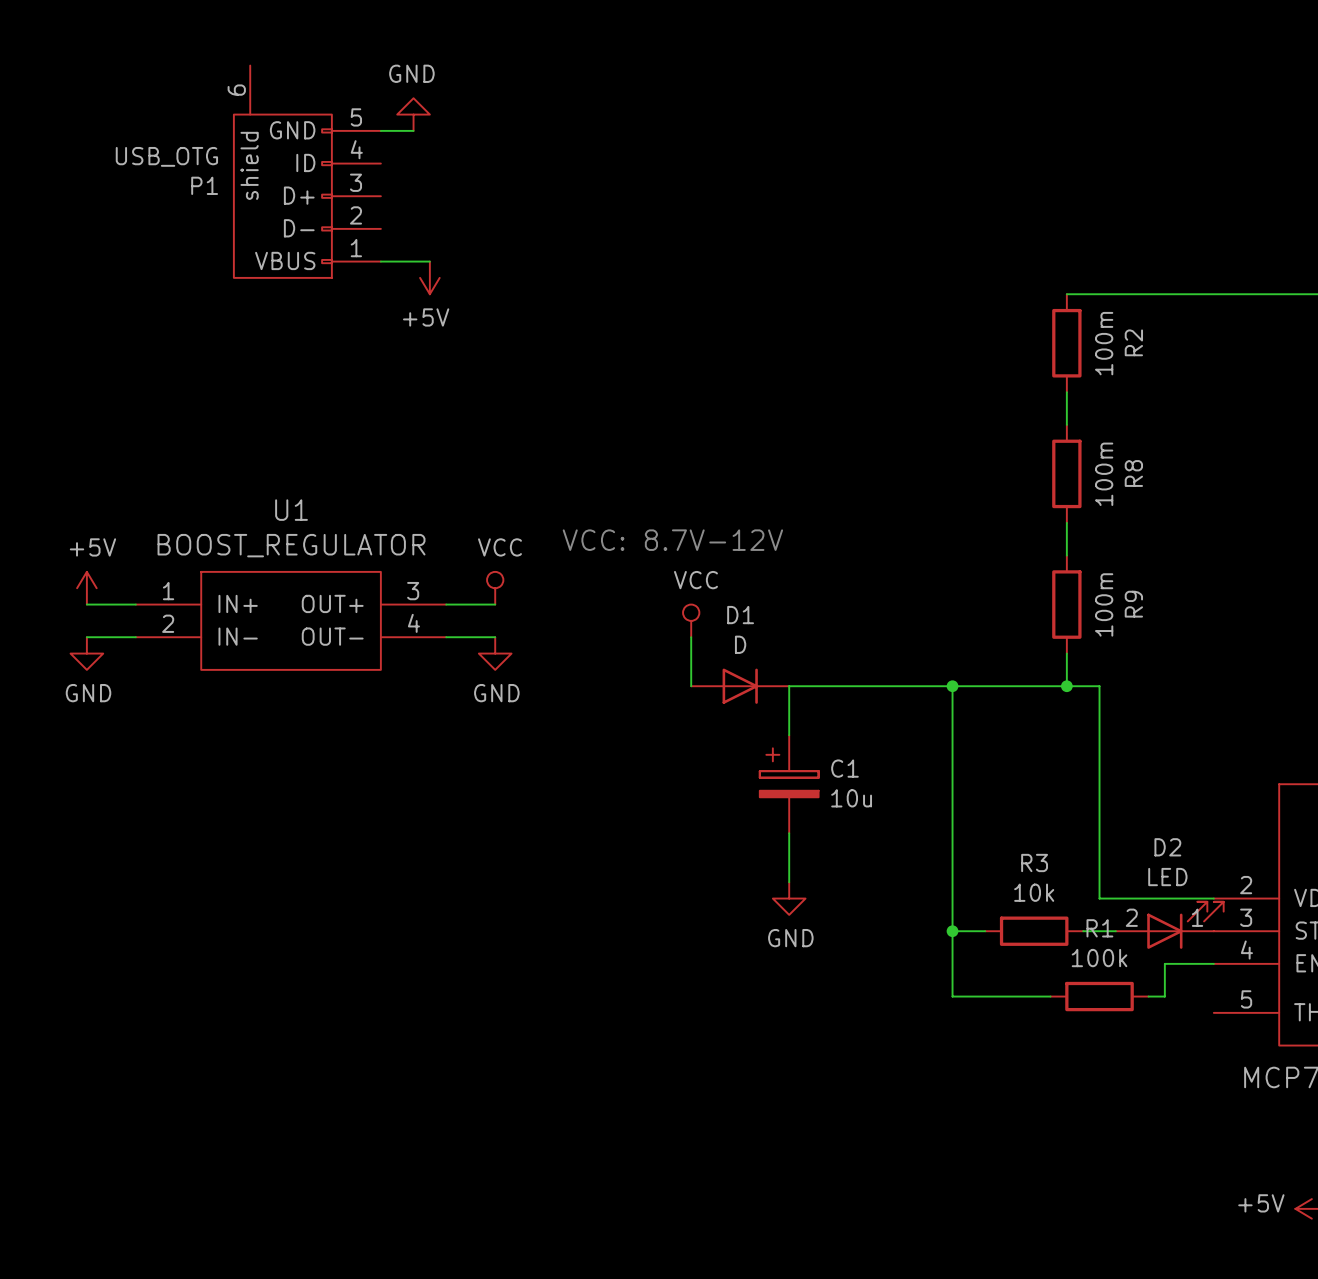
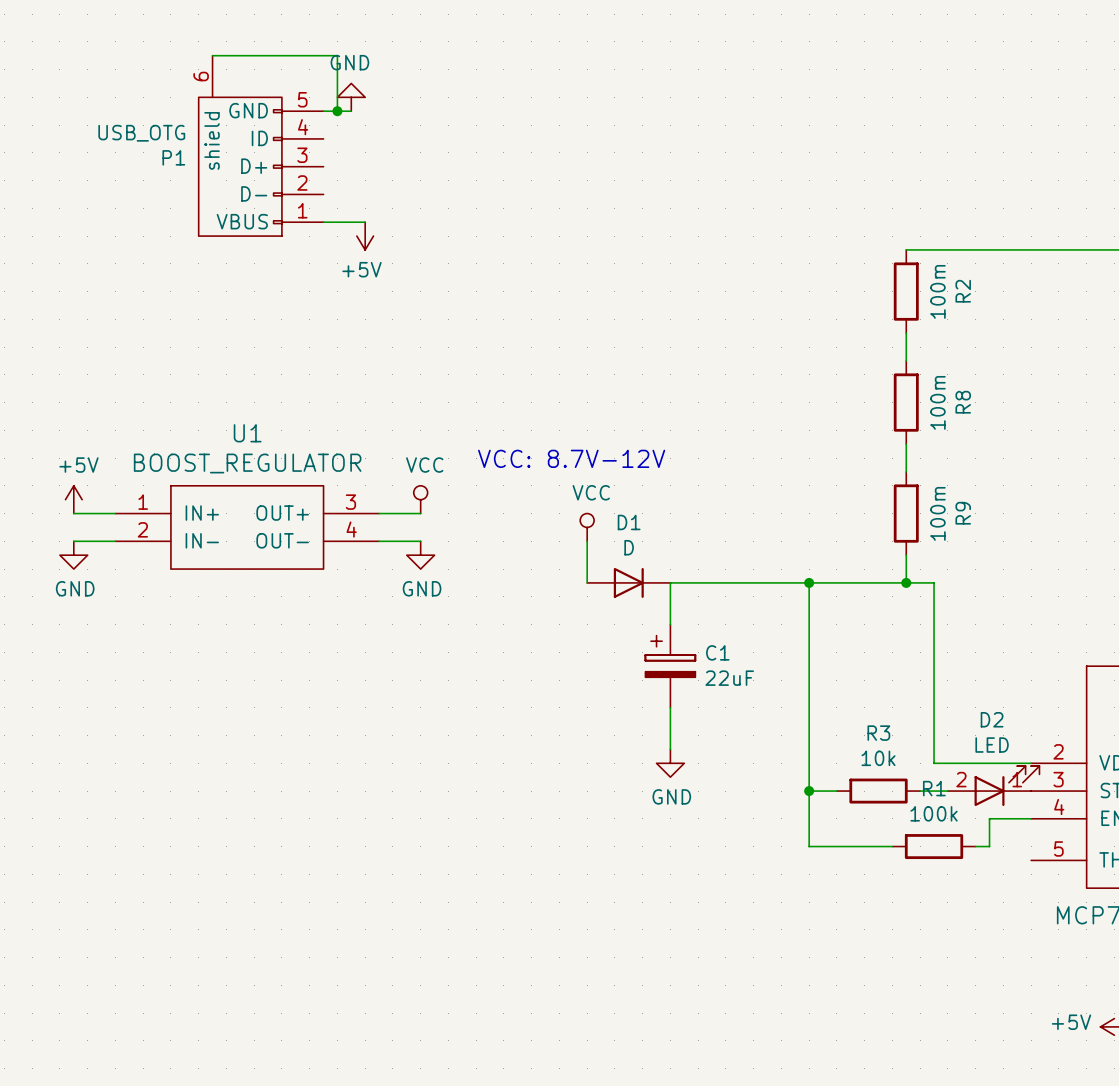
wire: none -> (212, 55) (337, 55) (337, 111)
junction: none -> (337, 111)
C1 value: 10u (851, 798) -> 22uF (729, 678)

